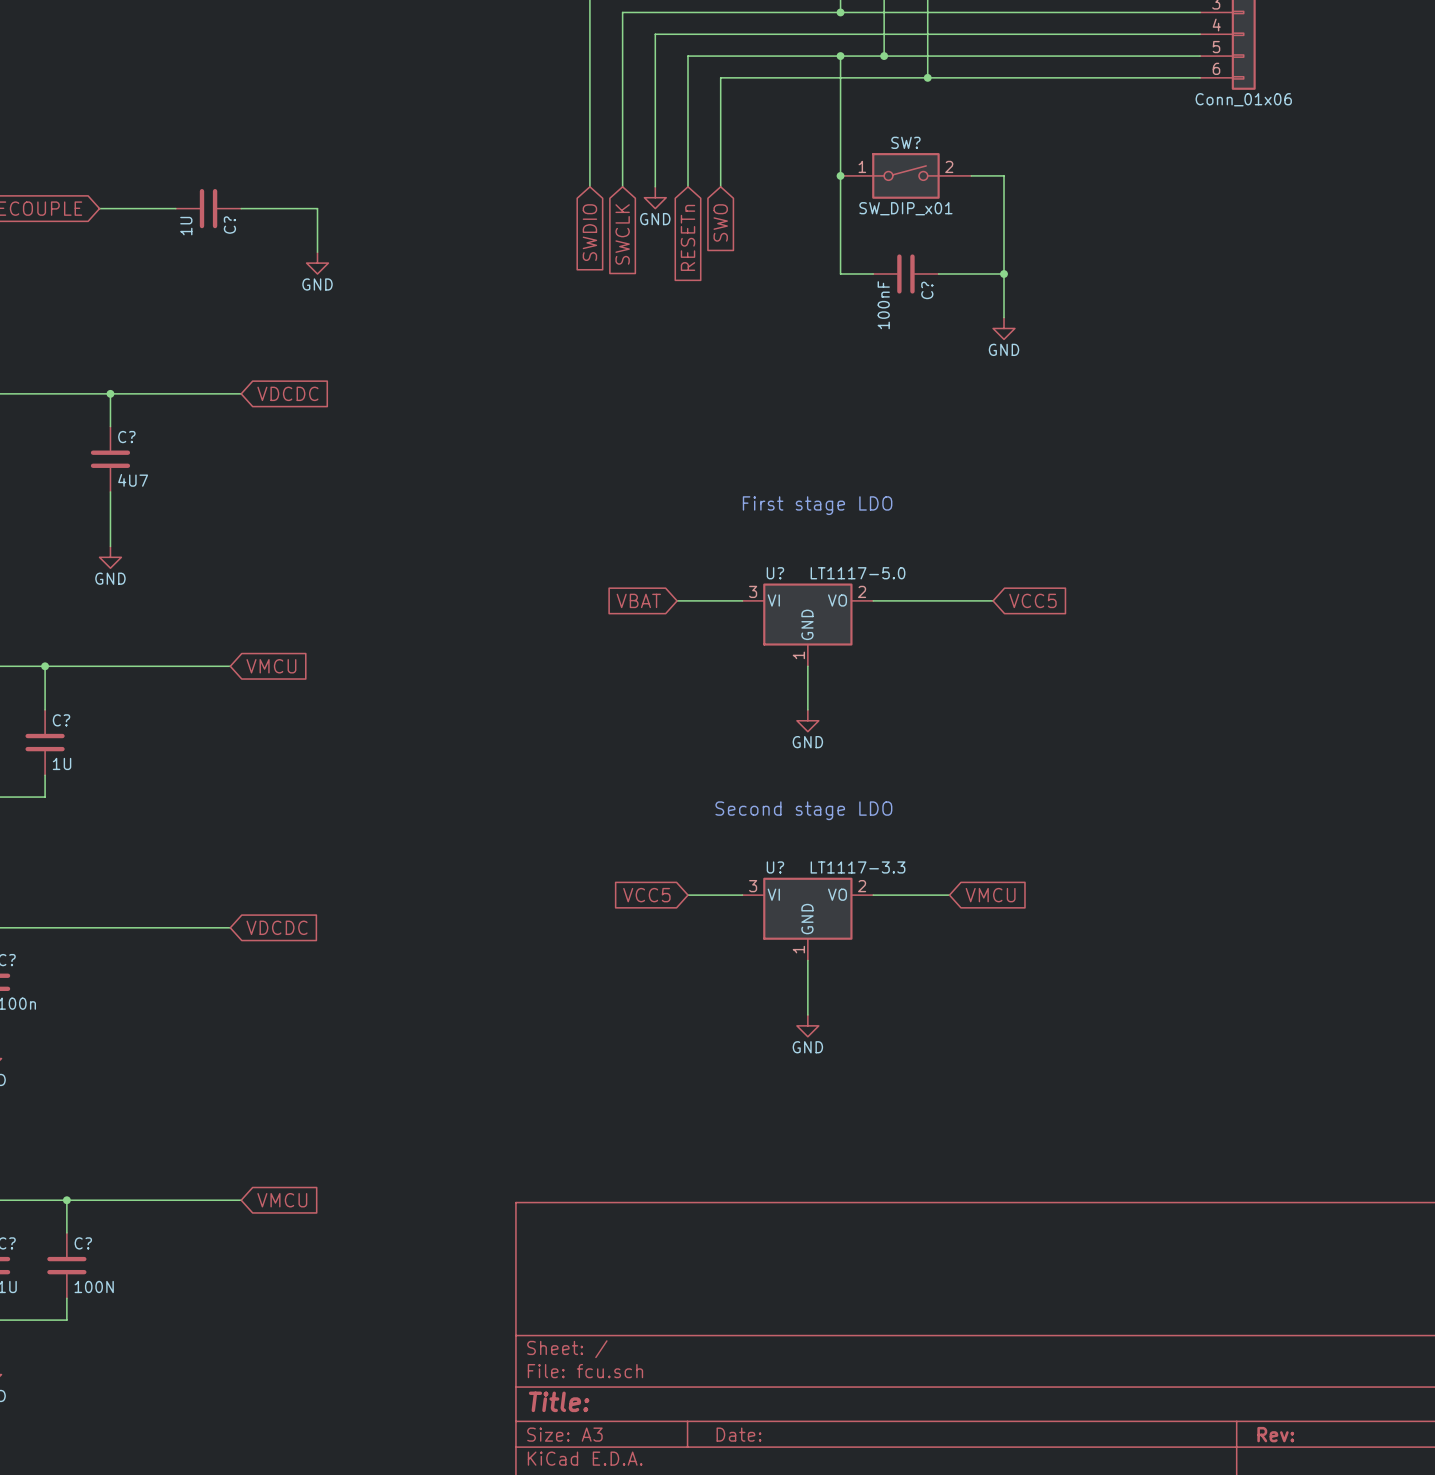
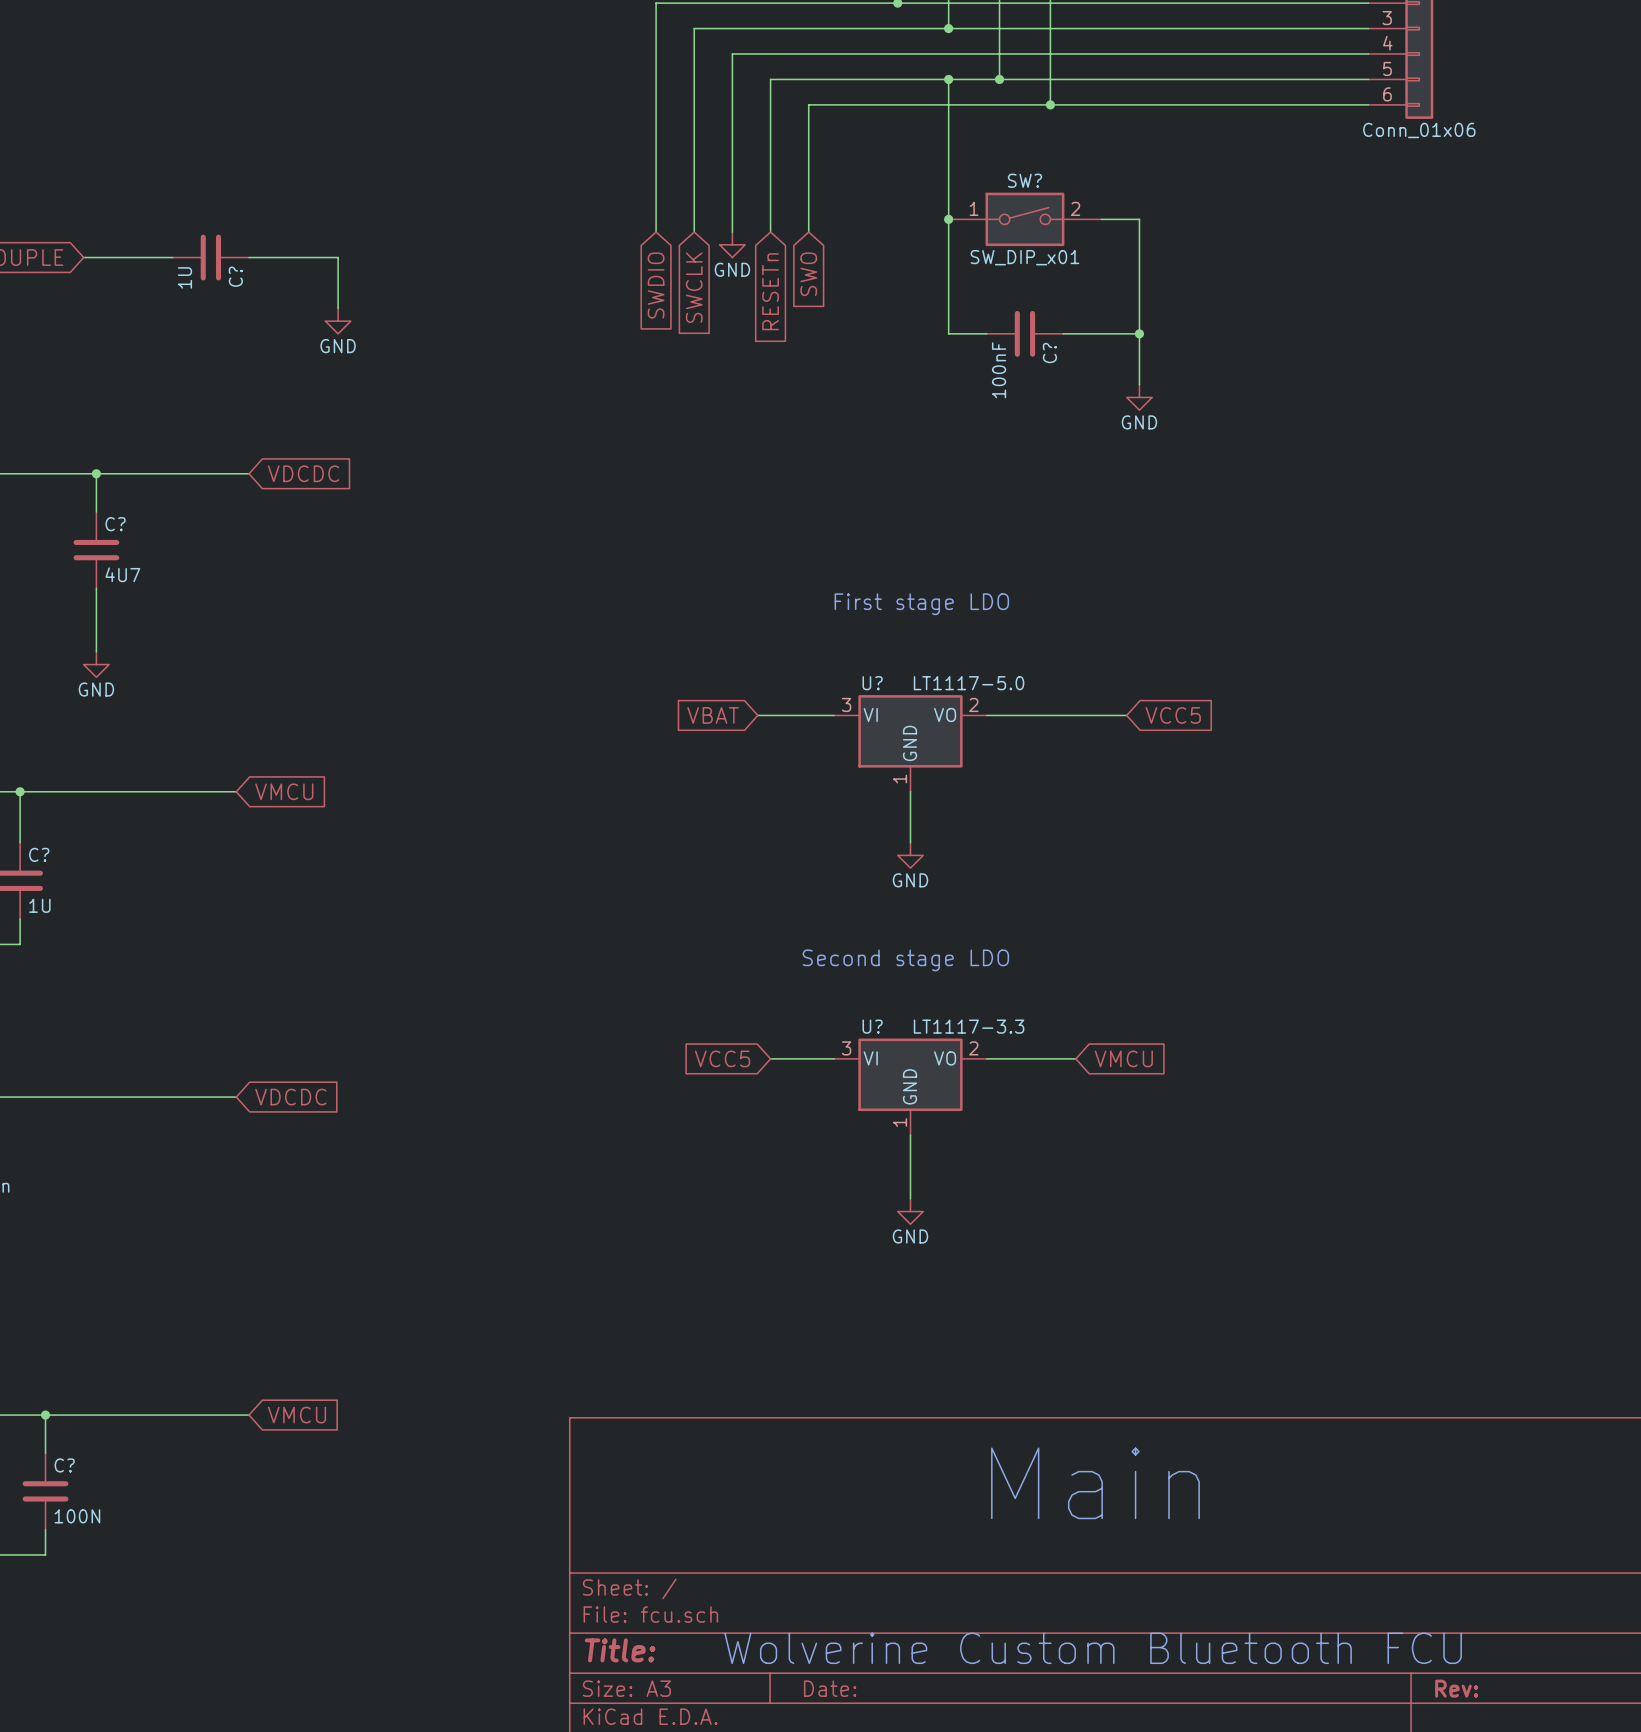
text: none -> Main (1095, 1483)
text: none -> Wolverine Custom Bluetooth FCU (1093, 1648)

